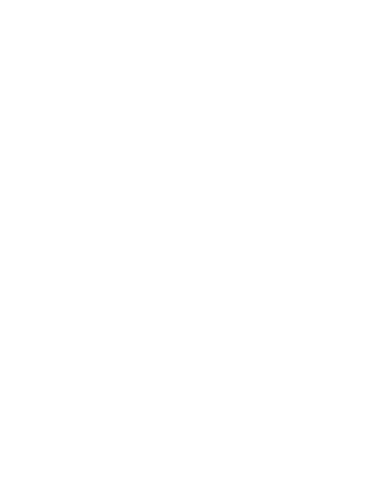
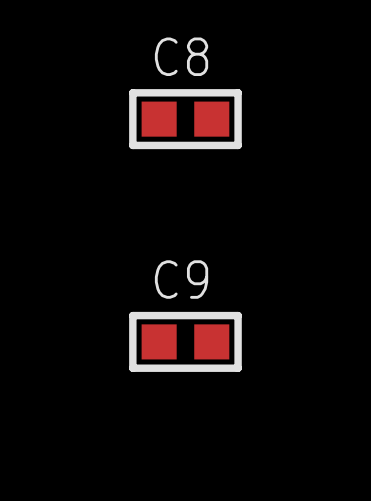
C8: none -> (185, 119)
C9: none -> (185, 341)

